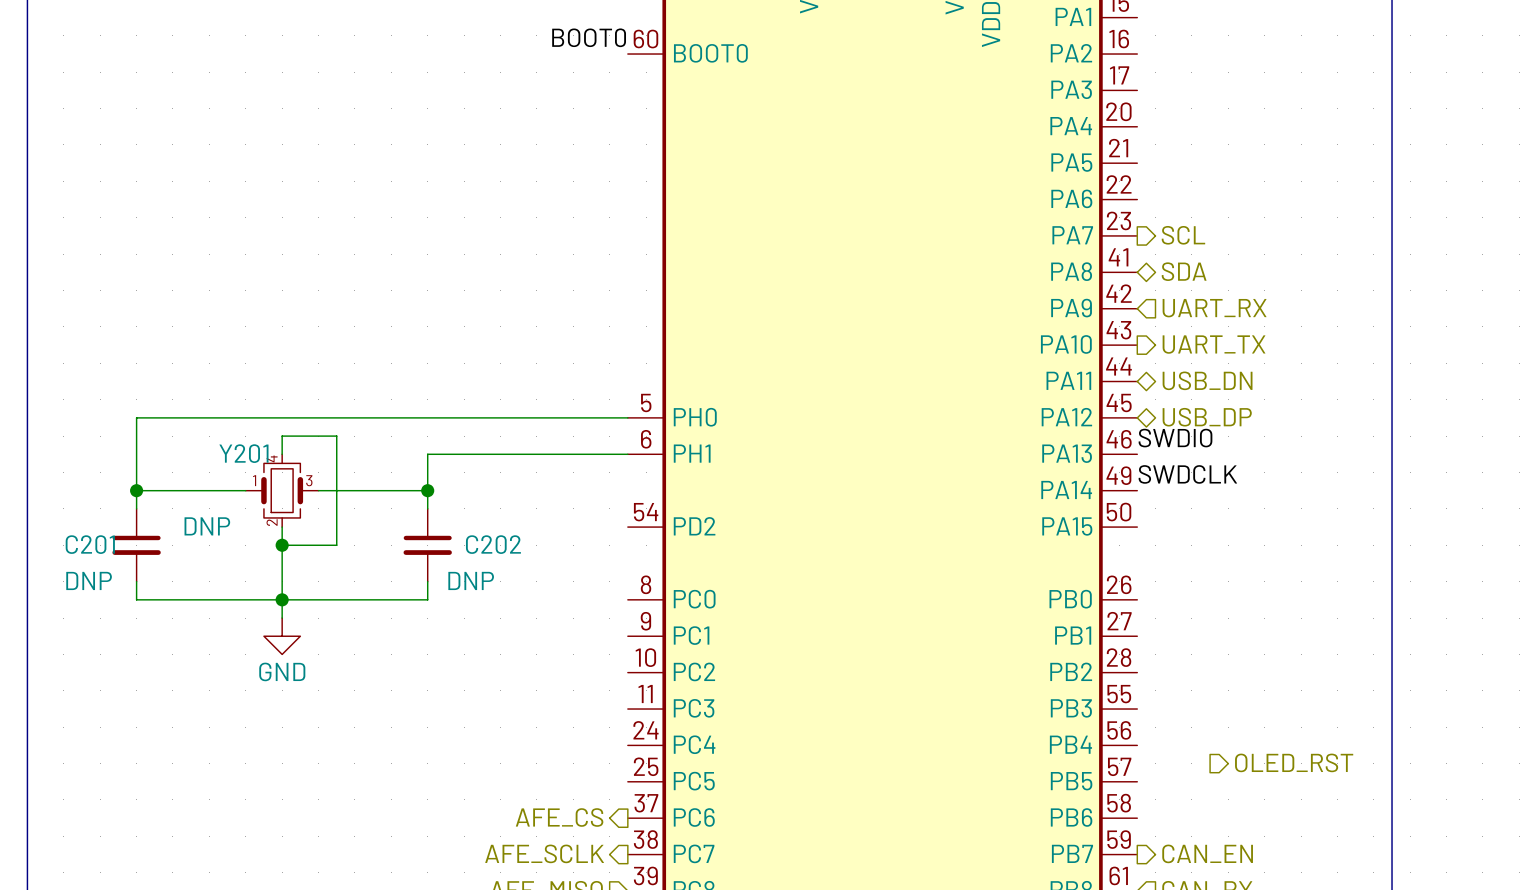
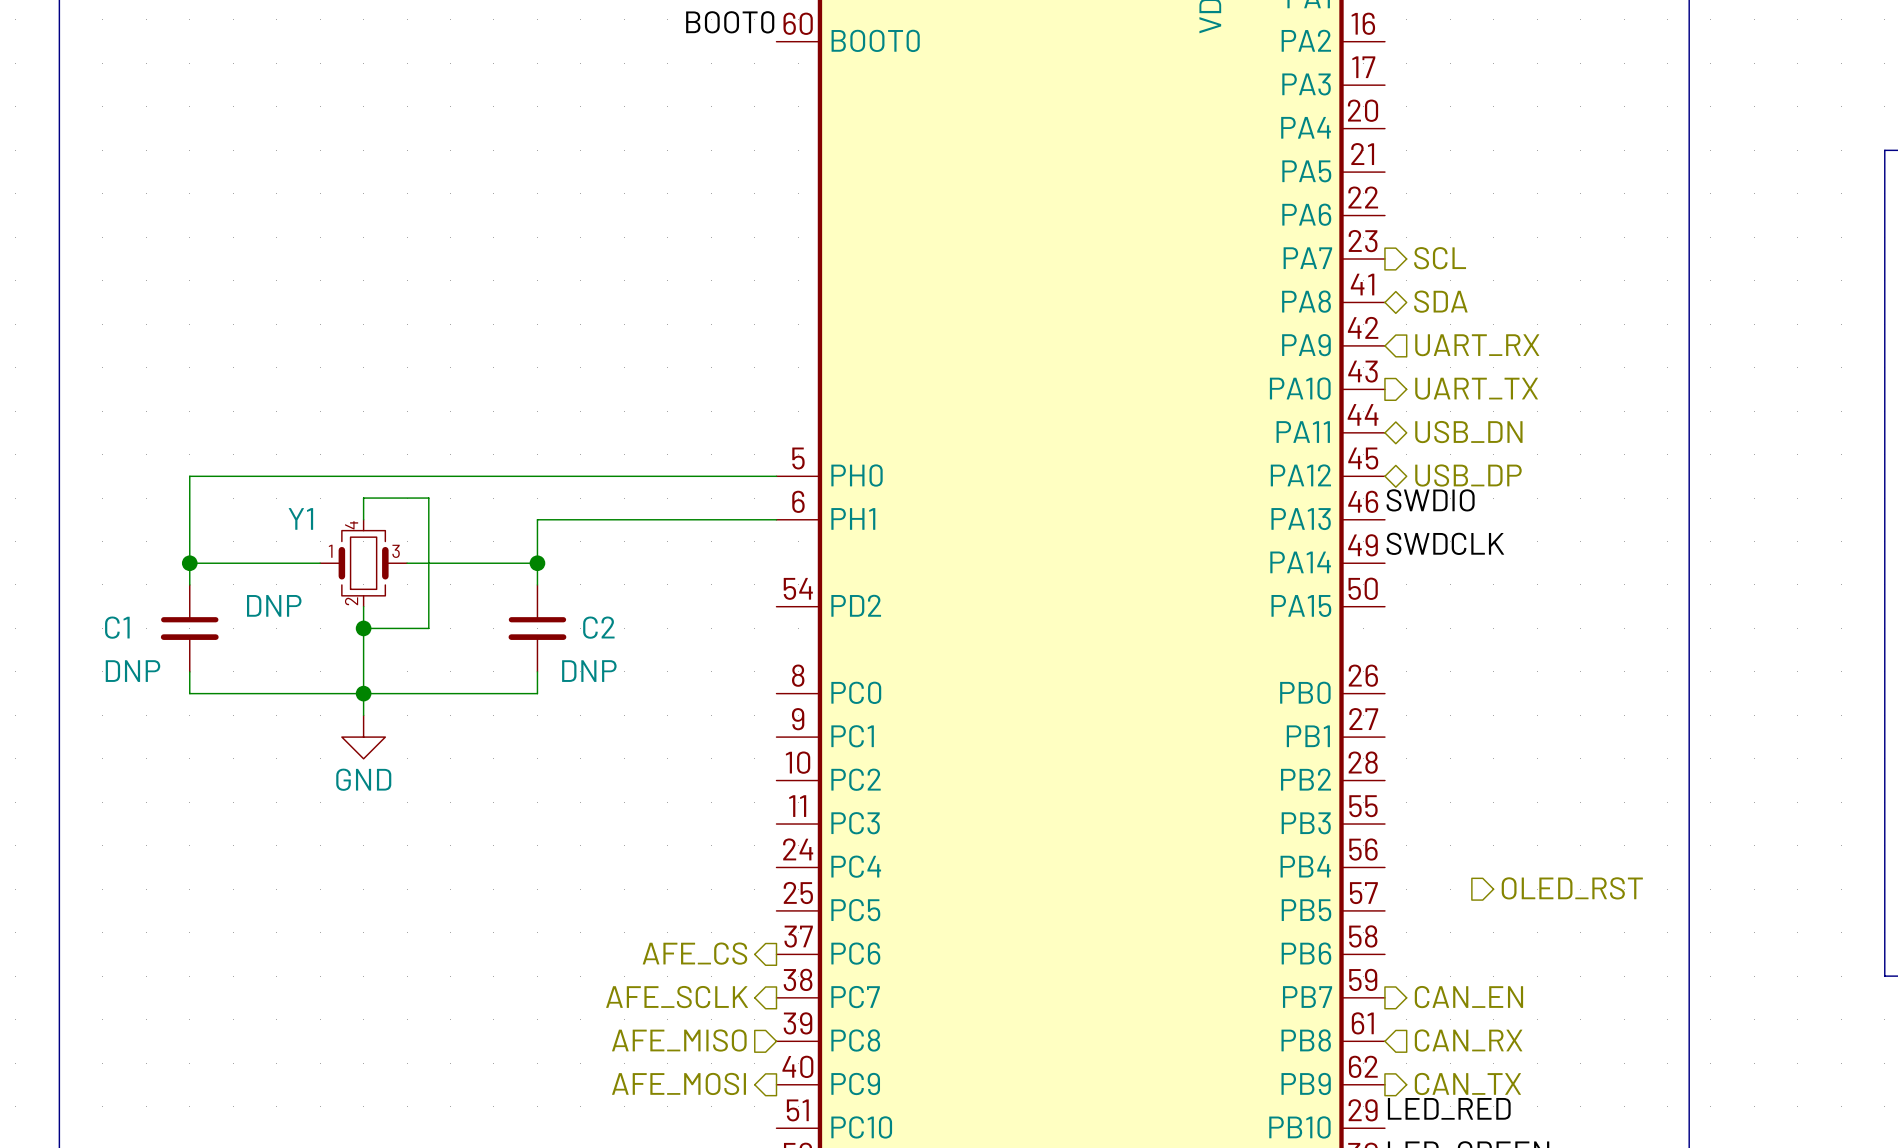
Y201 name: Y201 (243, 453) -> Y1 (300, 518)
C201 name: C201 (90, 544) -> C1 (117, 627)
C202 name: C202 (493, 544) -> C2 (598, 627)

